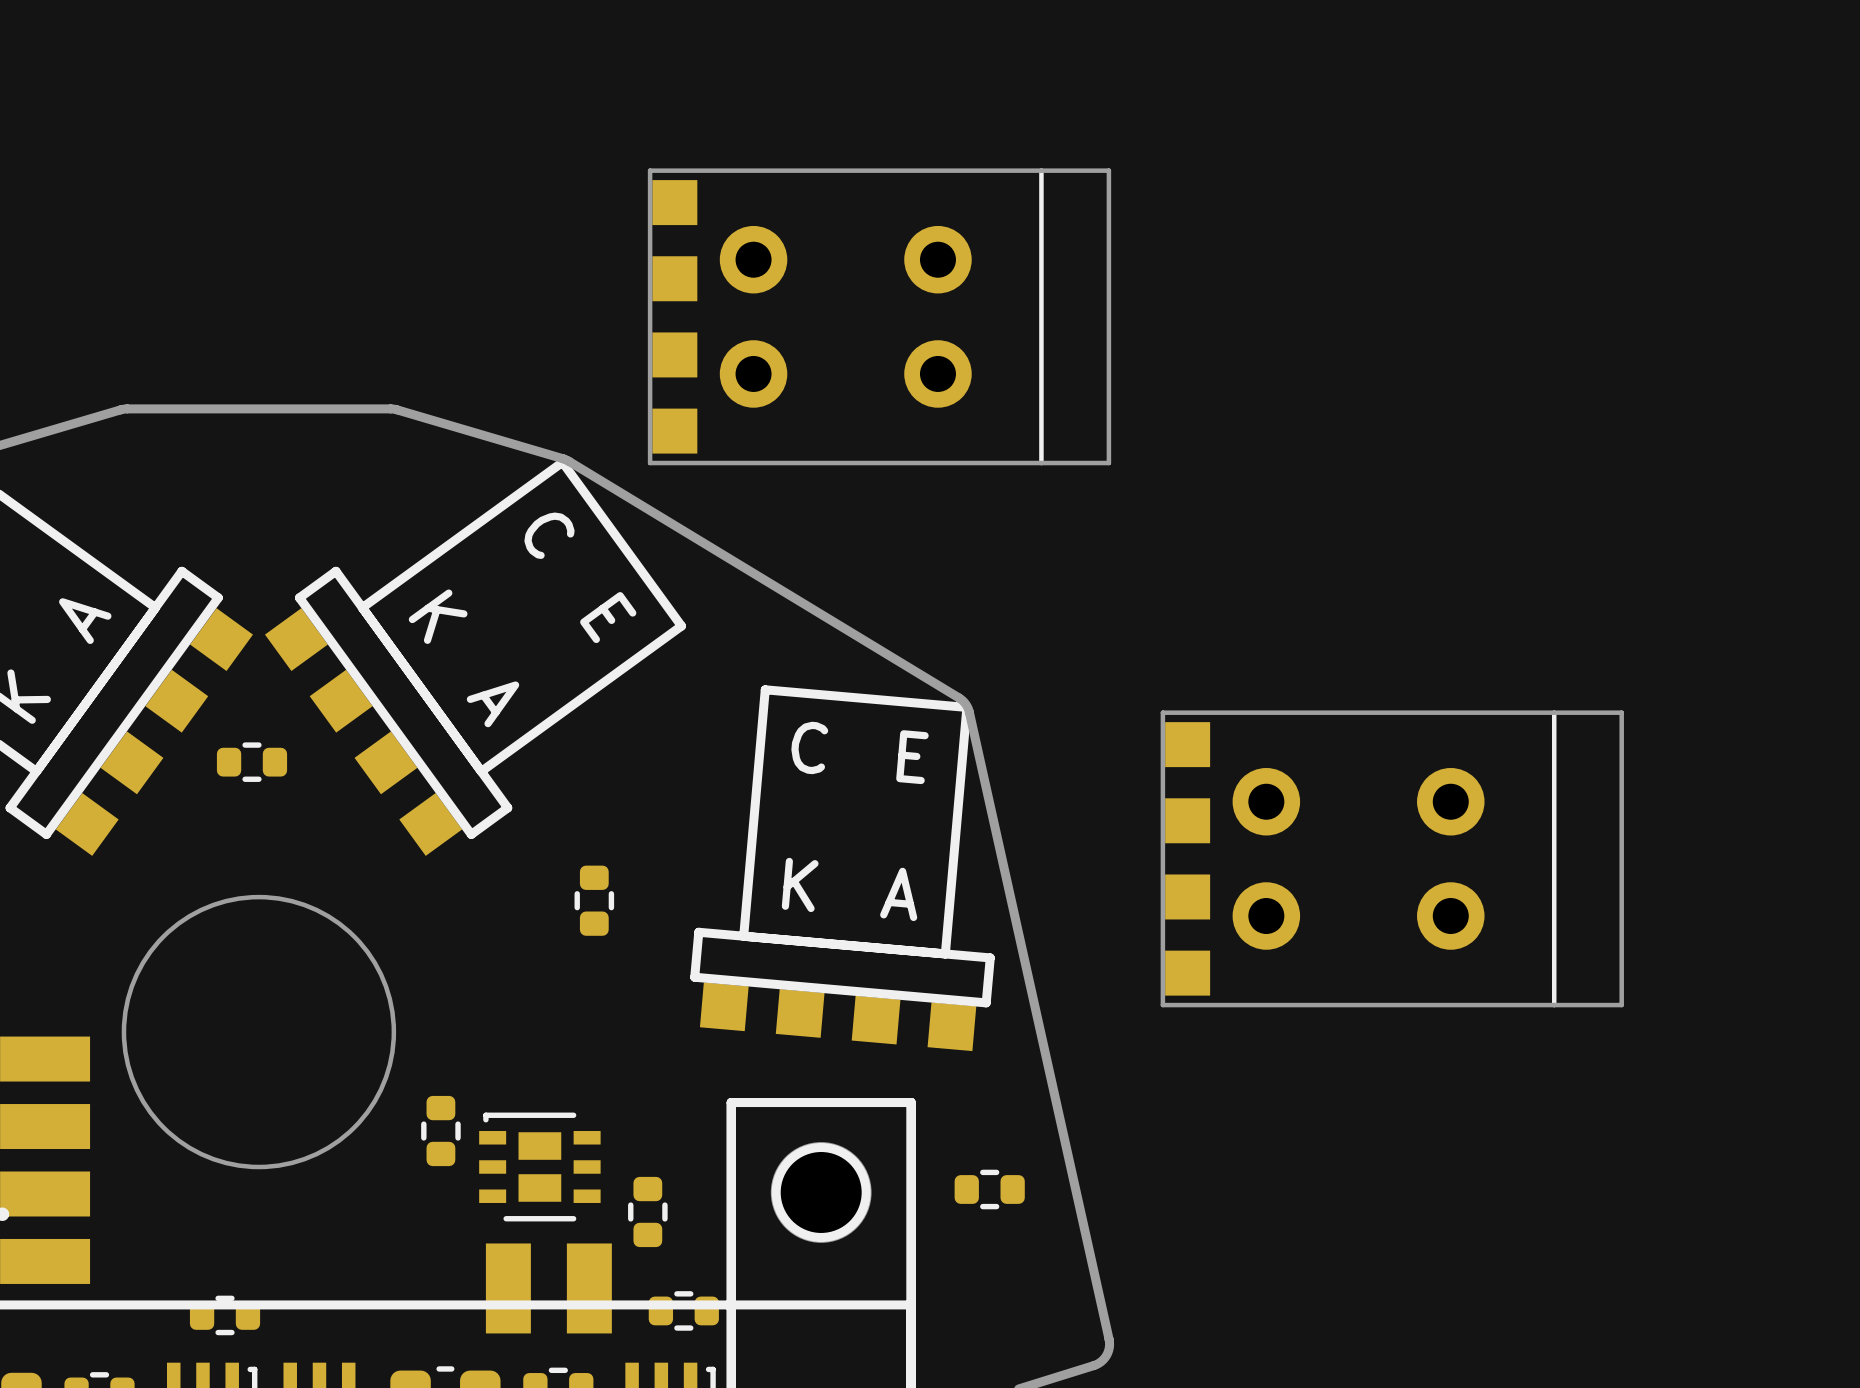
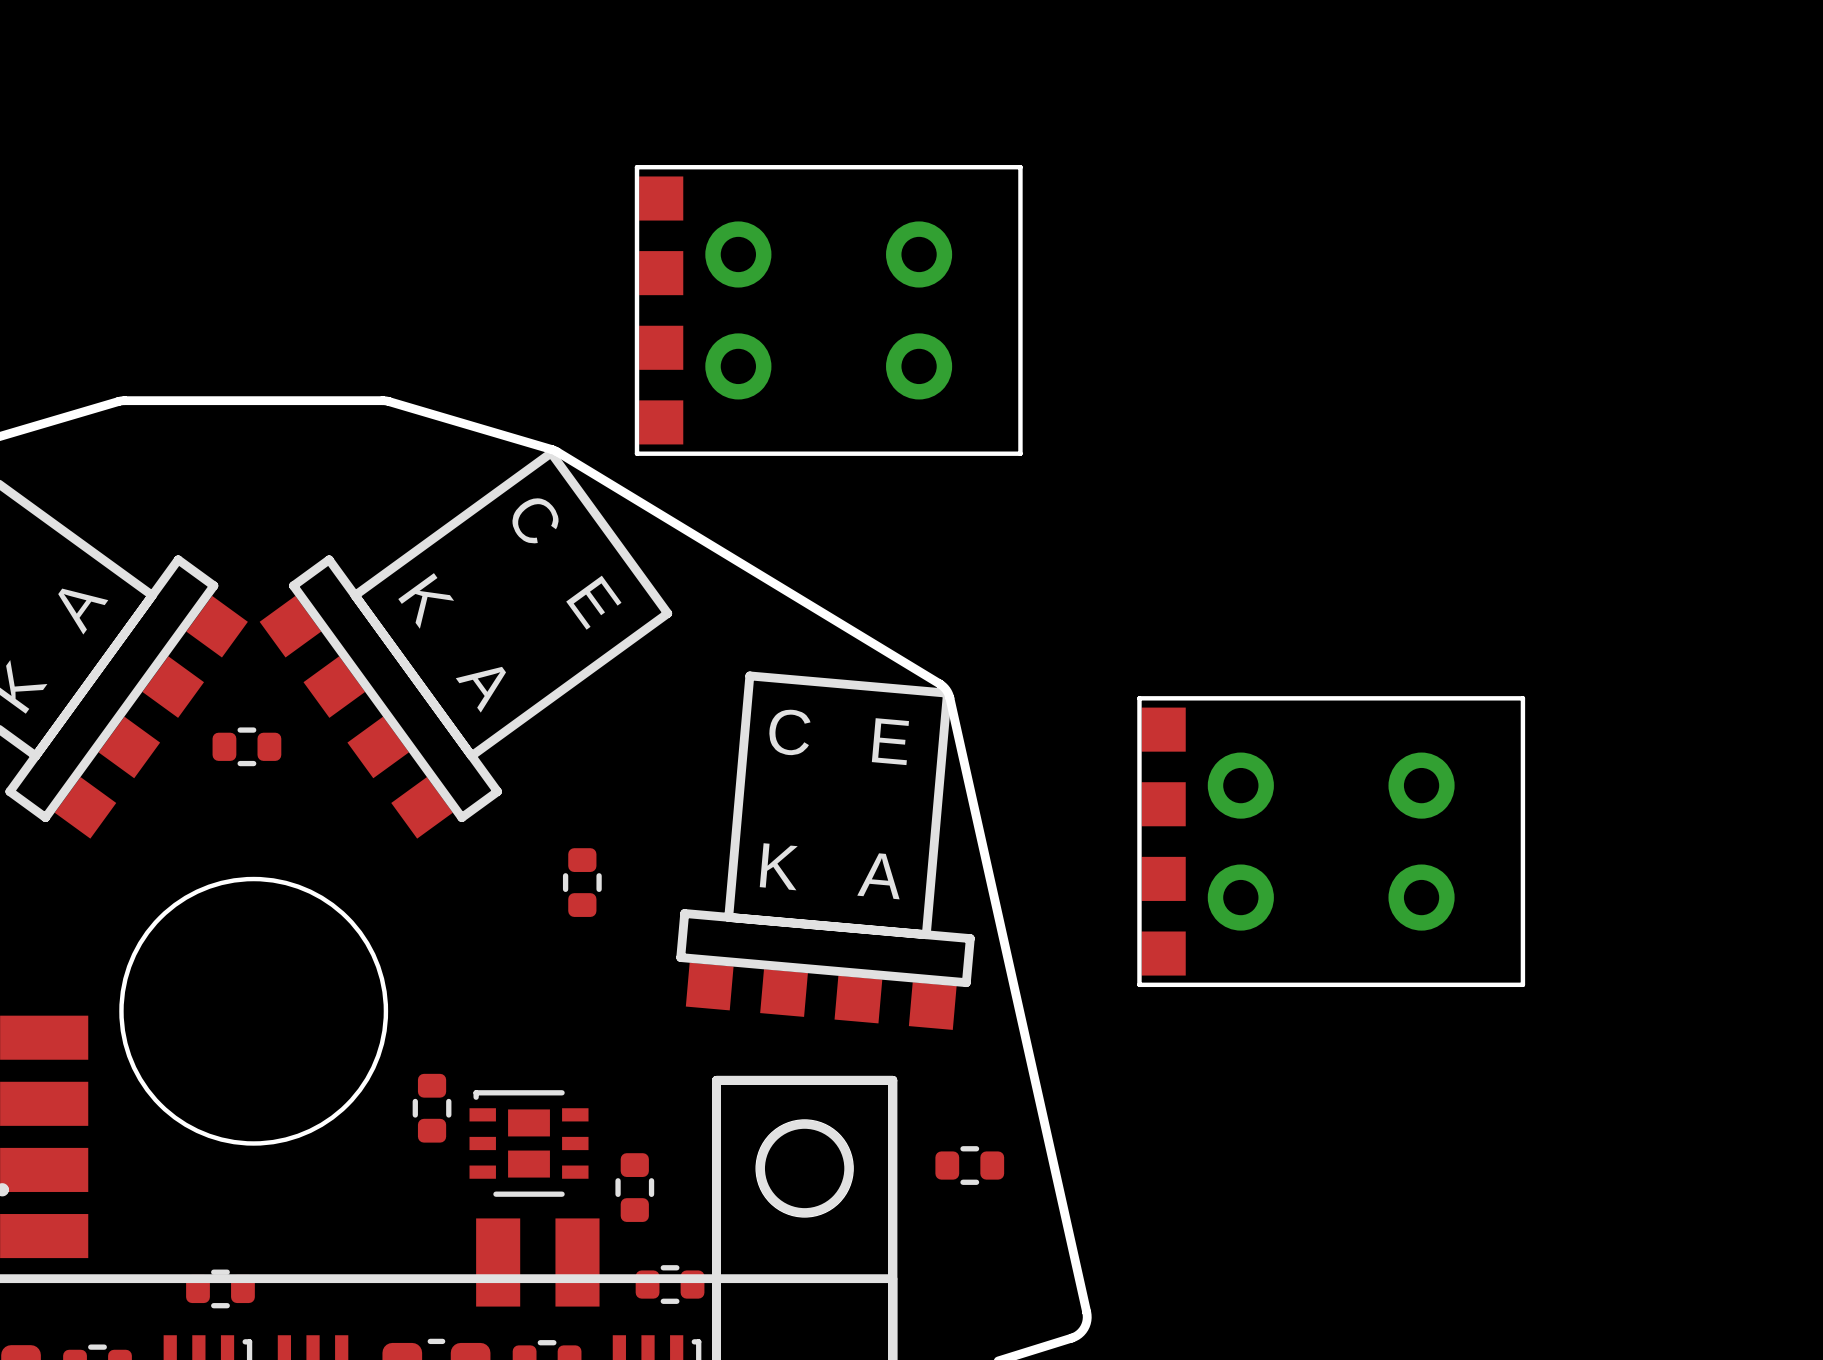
line: (1041, 170) (1041, 463) -> none
board edge: (1041, 170) (1108, 170) (1108, 463) (1041, 463) -> (1020, 167) (1020, 453)
line: (1554, 712) (1554, 1005) -> none
board edge: (1554, 712) (1621, 712) (1621, 1005) (1554, 1005) -> (1522, 698) (1522, 984)

